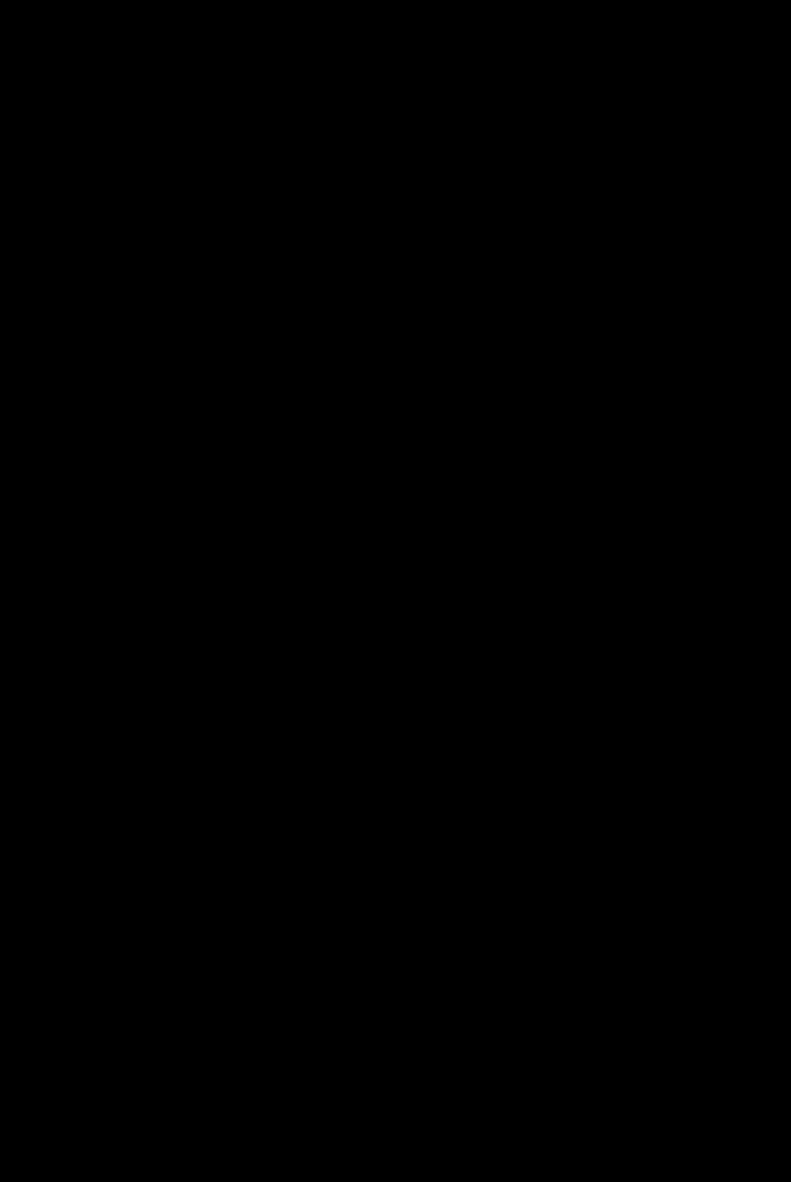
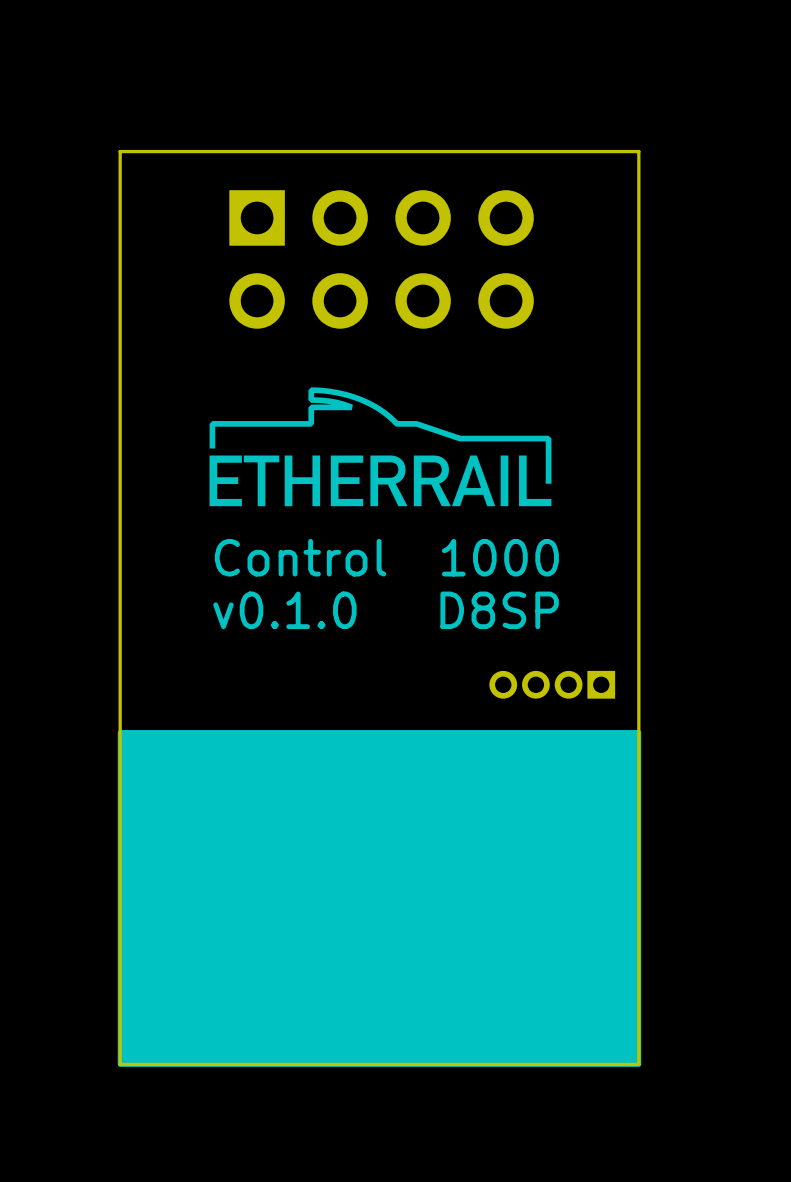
board edge: none -> (638, 151) (120, 151) (120, 1064) (638, 1064) (638, 151)
part: none -> (381, 259)
drawing: none -> [209, 387, 552, 507]
text: none -> Control 1000 (386, 557)
text: none -> v0.1.0 D8SP (386, 610)
part: none -> (552, 684)
drawing: none -> [117, 730, 642, 1067]

